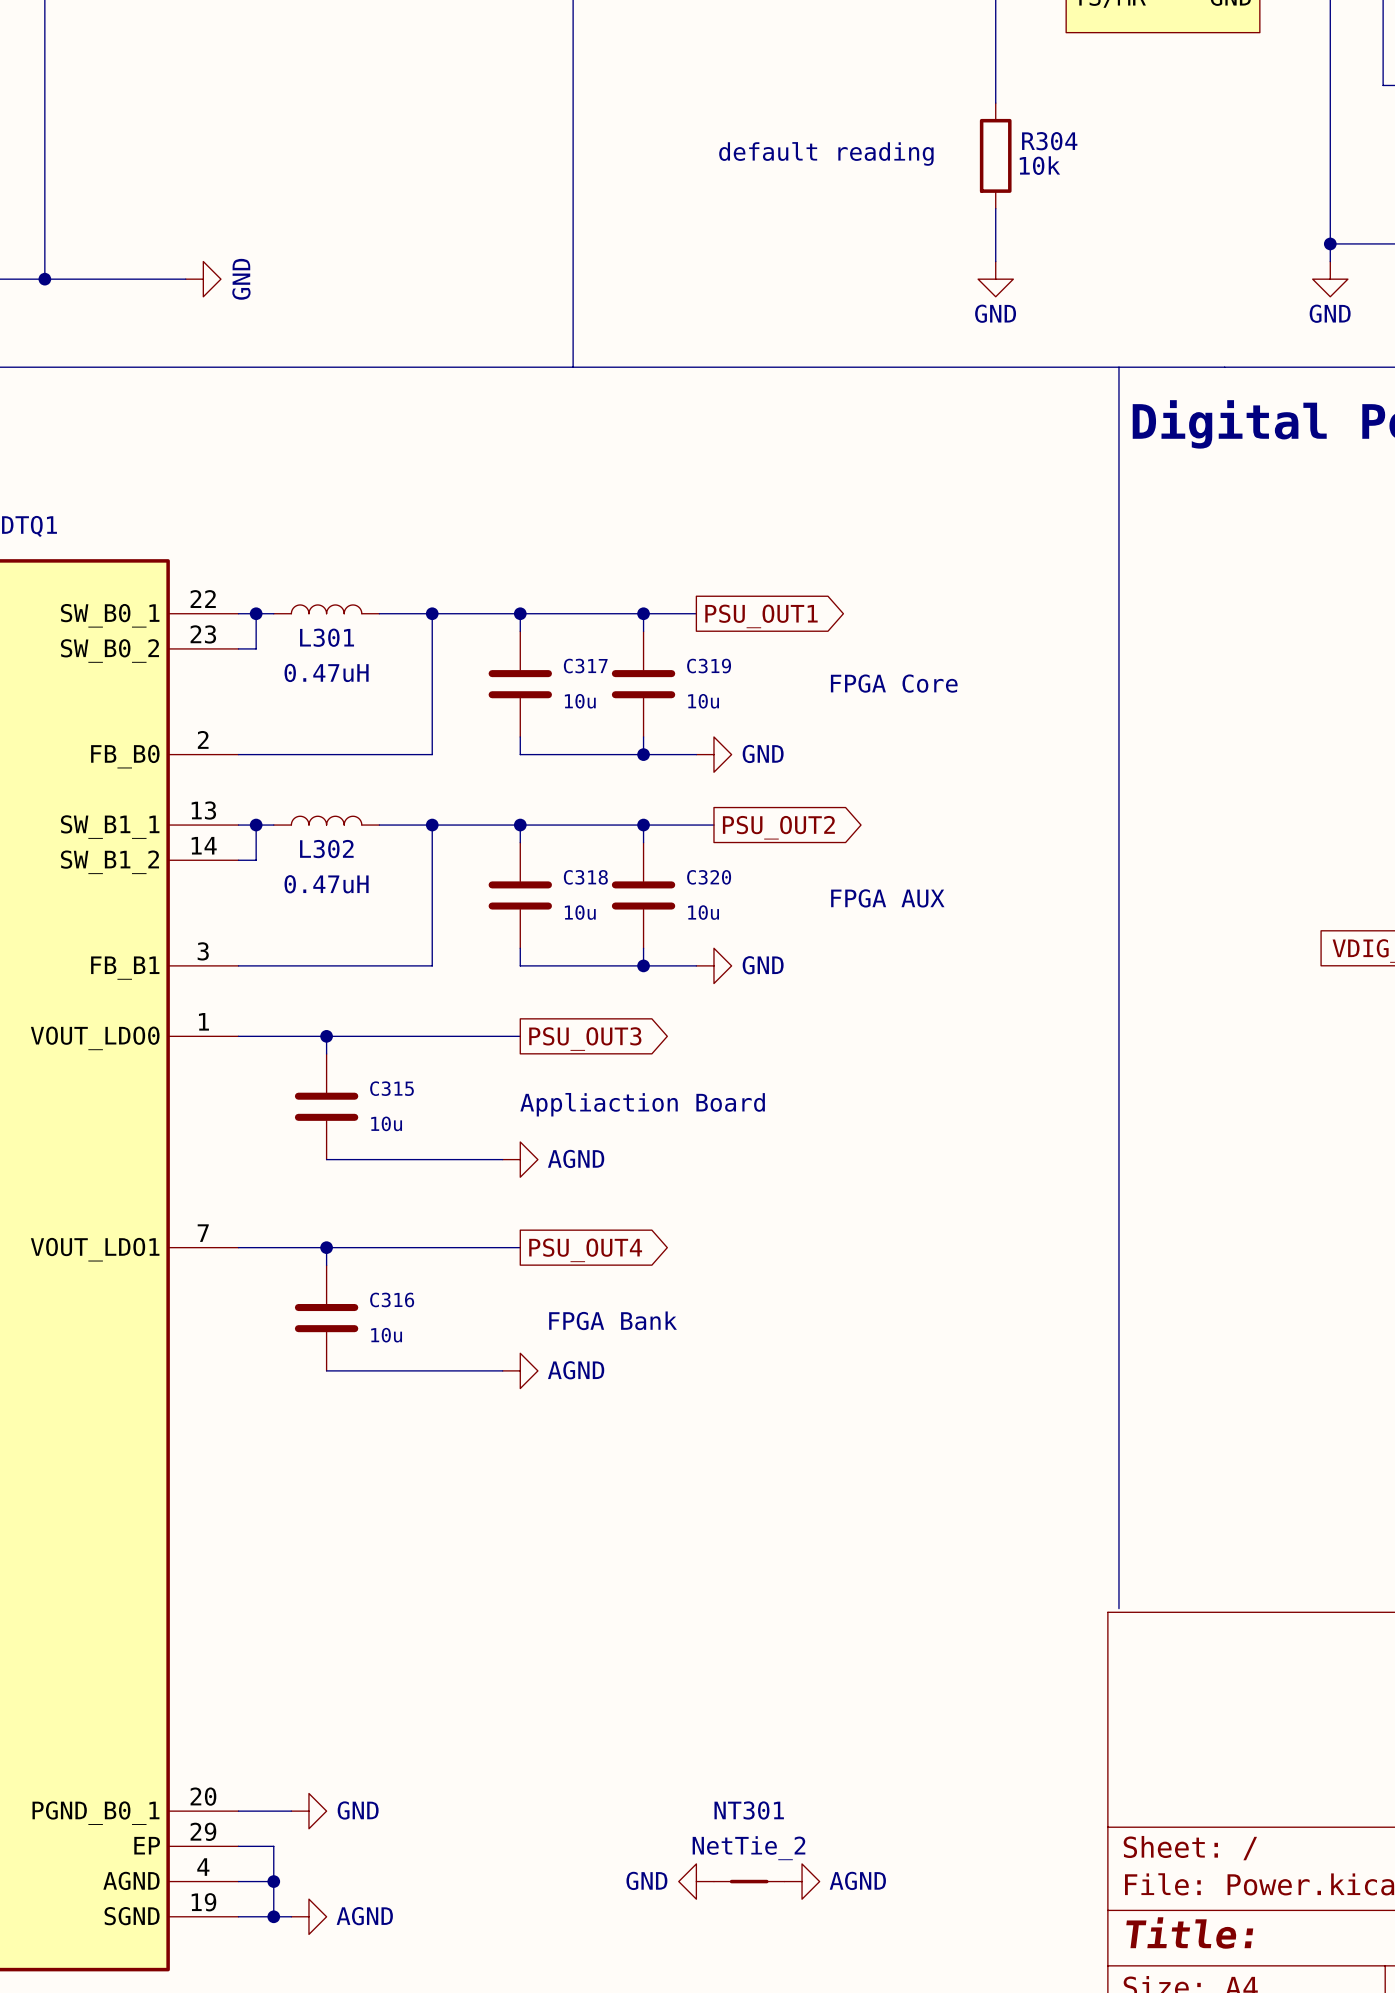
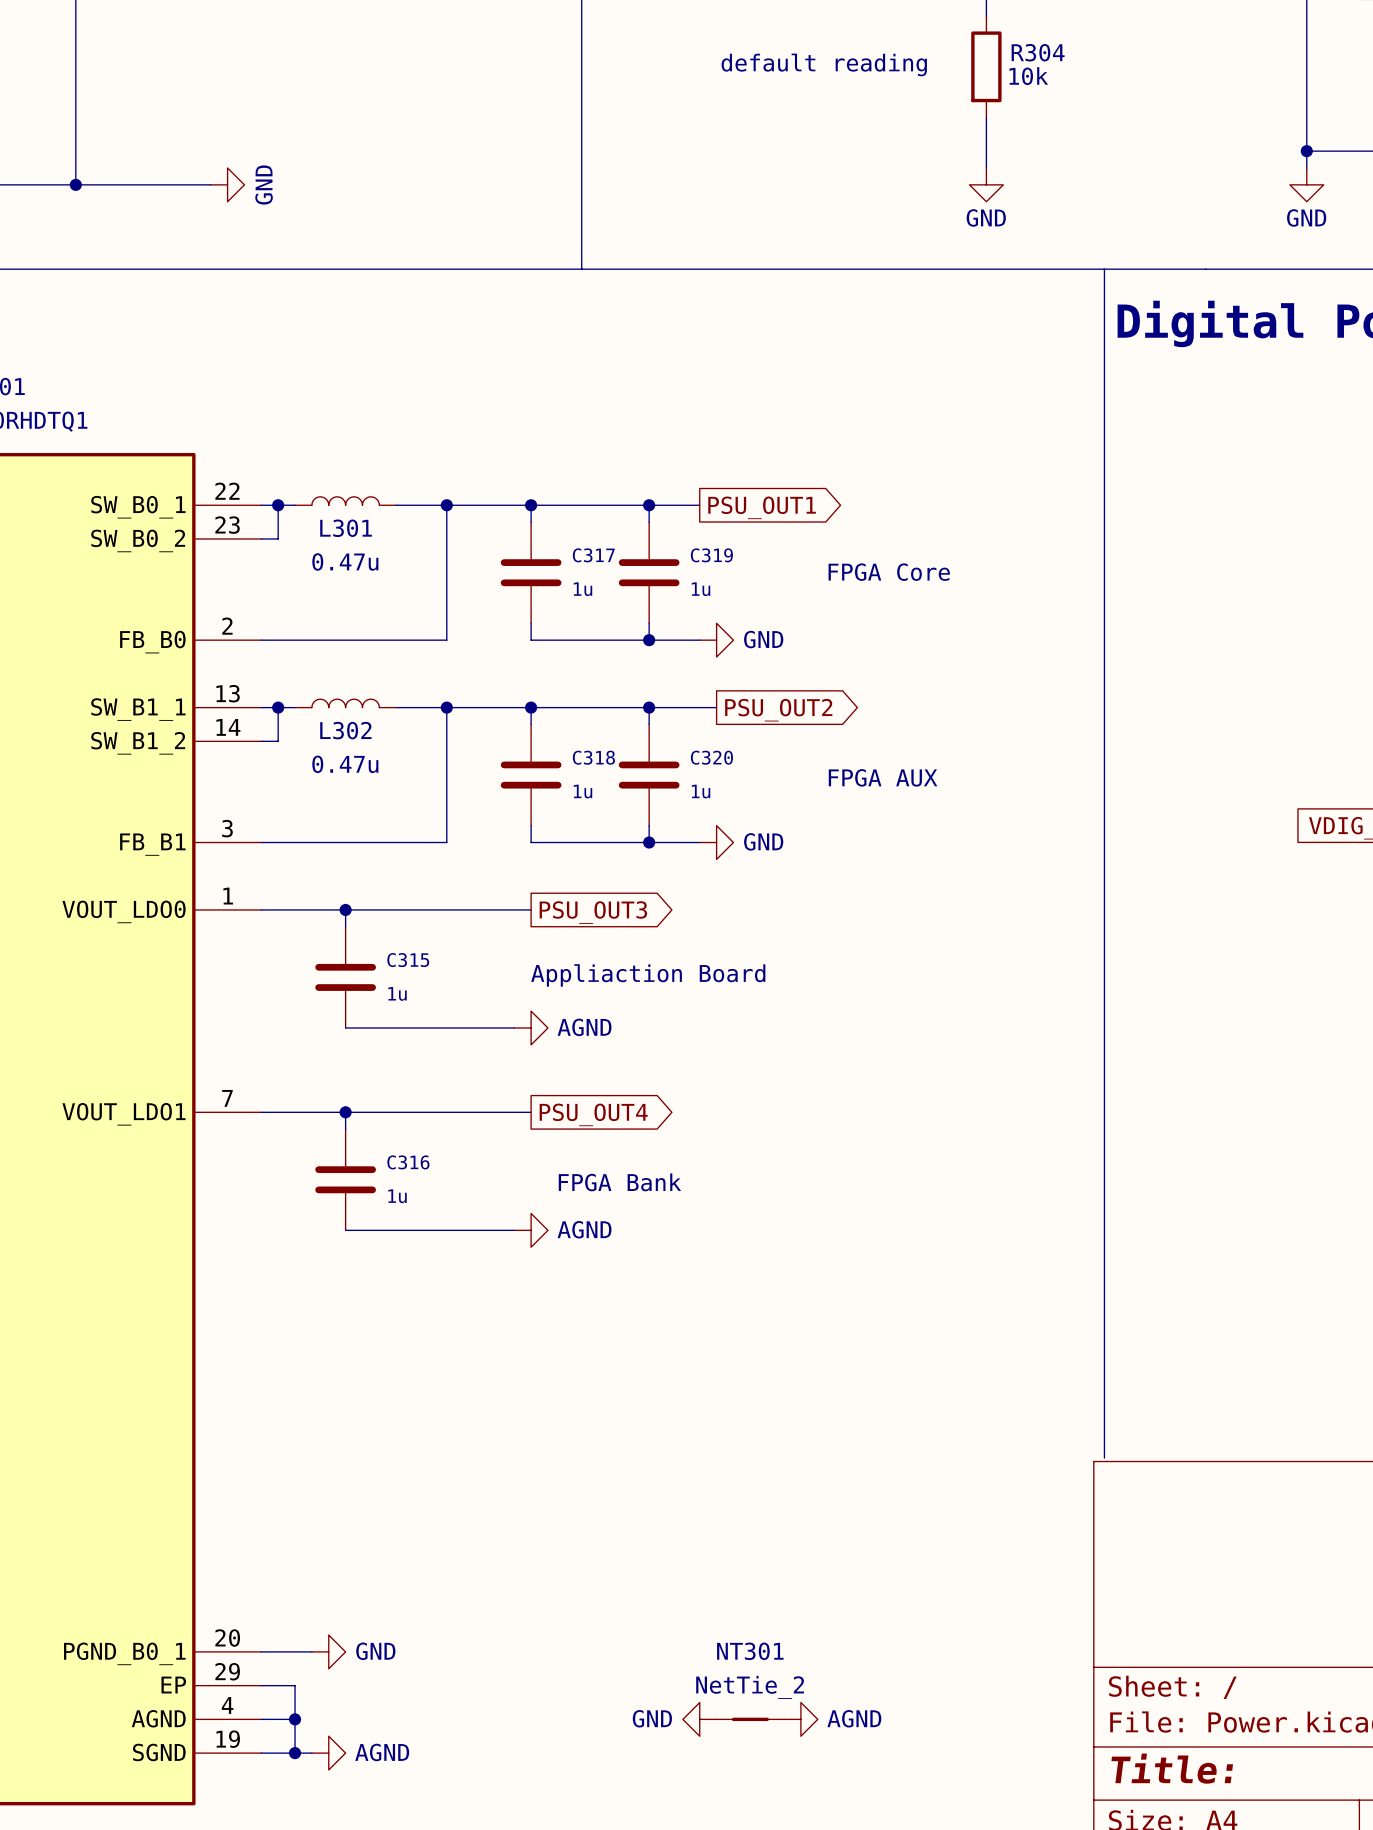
L301 value: 0.47uH (326, 672) -> 0.47u (345, 561)
C317 value: 10u (580, 701) -> 1u (583, 589)
C319 value: 10u (703, 701) -> 1u (701, 589)
L302 value: 0.47uH (326, 884) -> 0.47u (345, 764)
C318 value: 10u (580, 912) -> 1u (583, 791)
C320 value: 10u (703, 912) -> 1u (701, 791)
C315 value: 10u (386, 1123) -> 1u (397, 993)
C316 value: 10u (386, 1335) -> 1u (397, 1196)

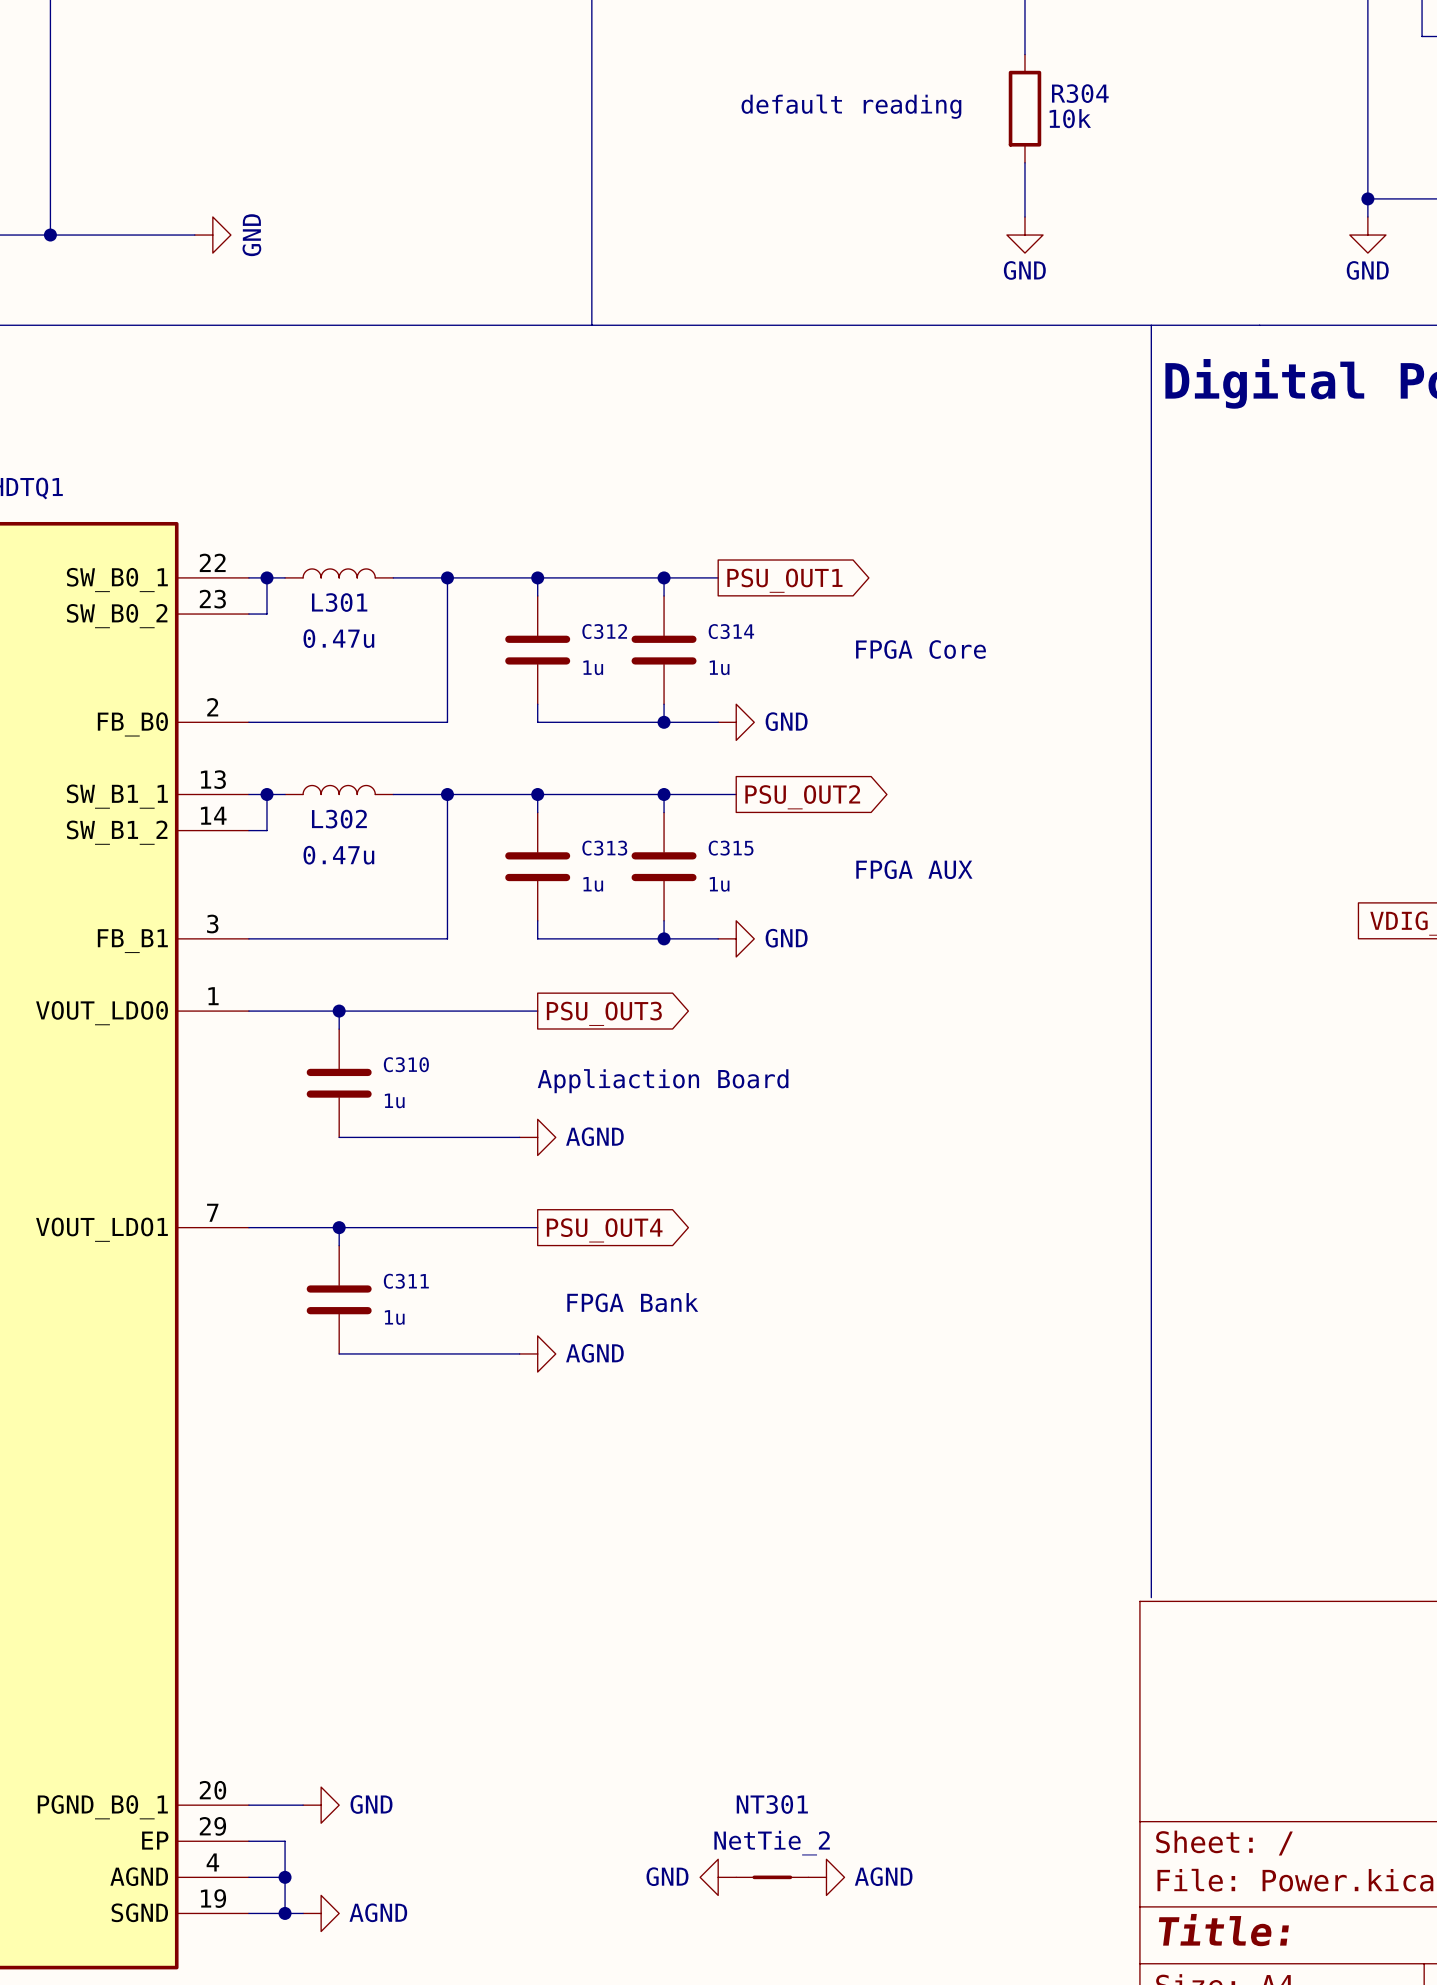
C317 name: C317 (593, 555) -> C312 (604, 631)
C319 name: C319 (711, 555) -> C314 (731, 631)
C318 name: C318 (593, 757) -> C313 (604, 848)
C320 name: C320 (711, 757) -> C315 (731, 848)
C315 name: C315 (408, 960) -> C310 (406, 1064)
C316 name: C316 (408, 1162) -> C311 (406, 1281)

